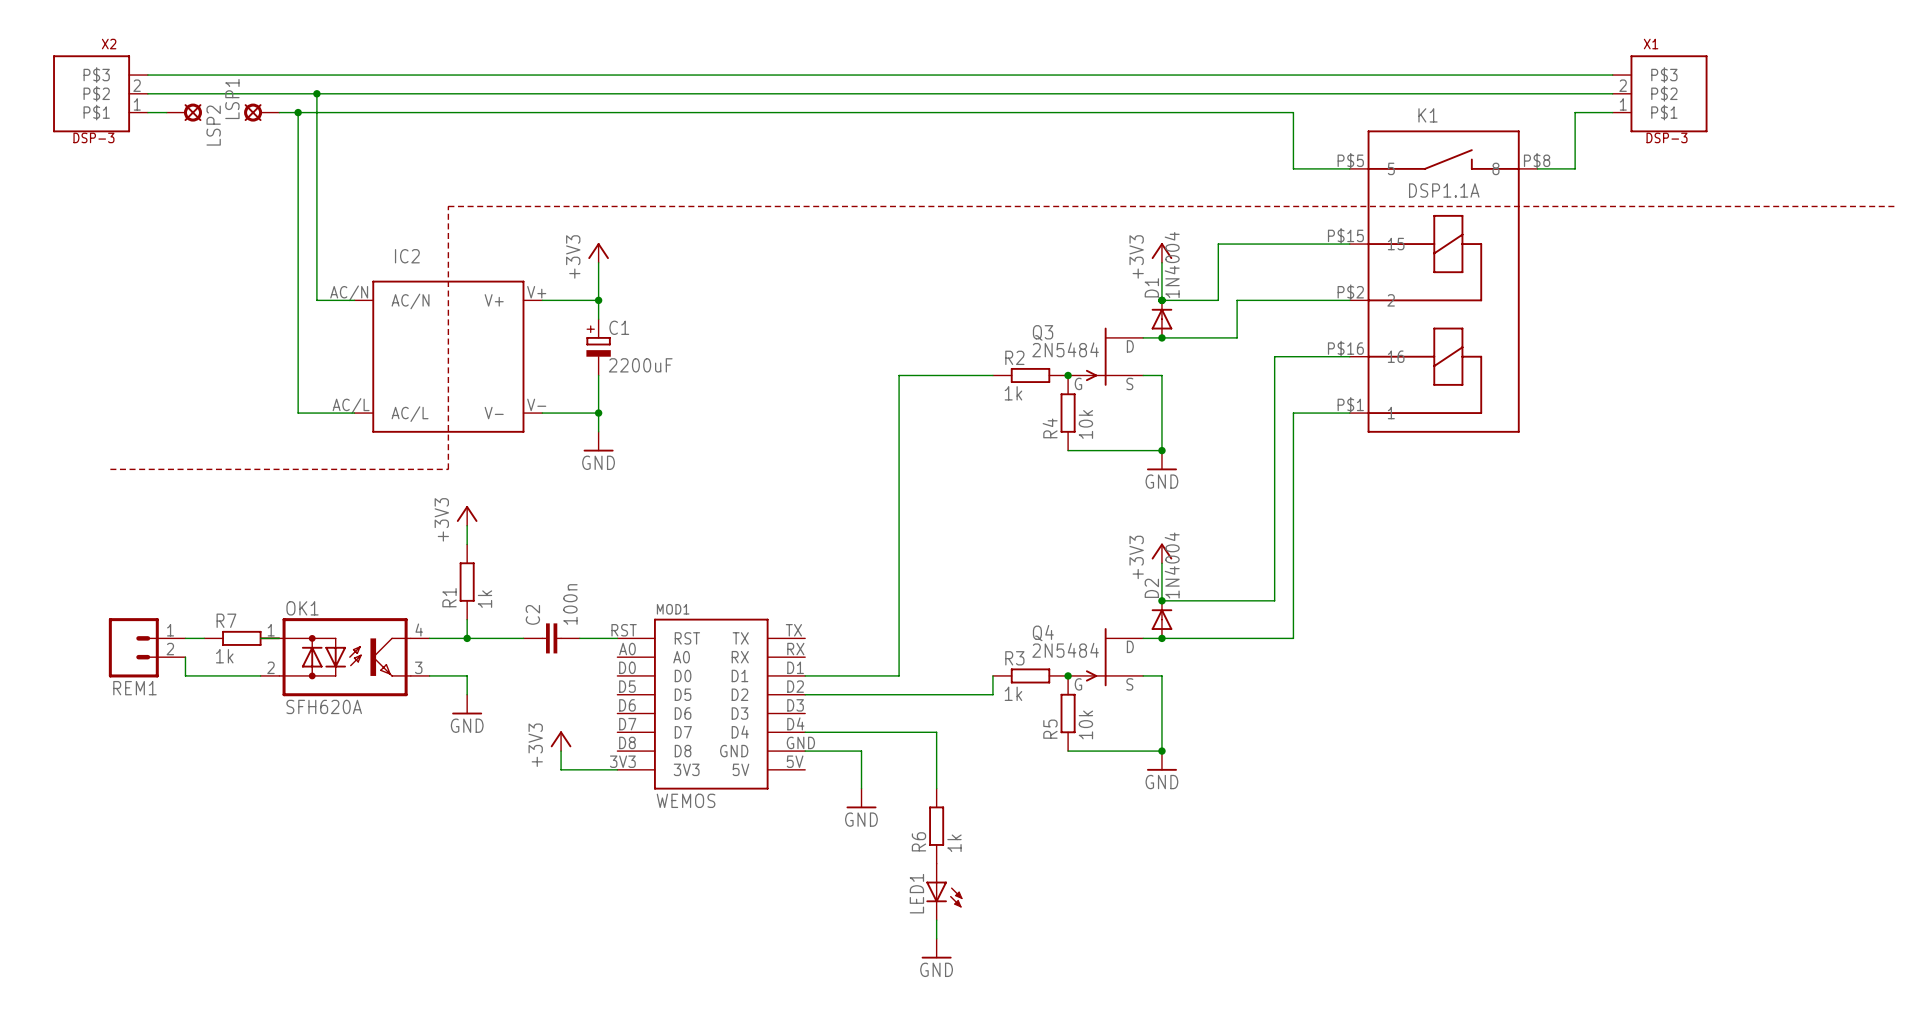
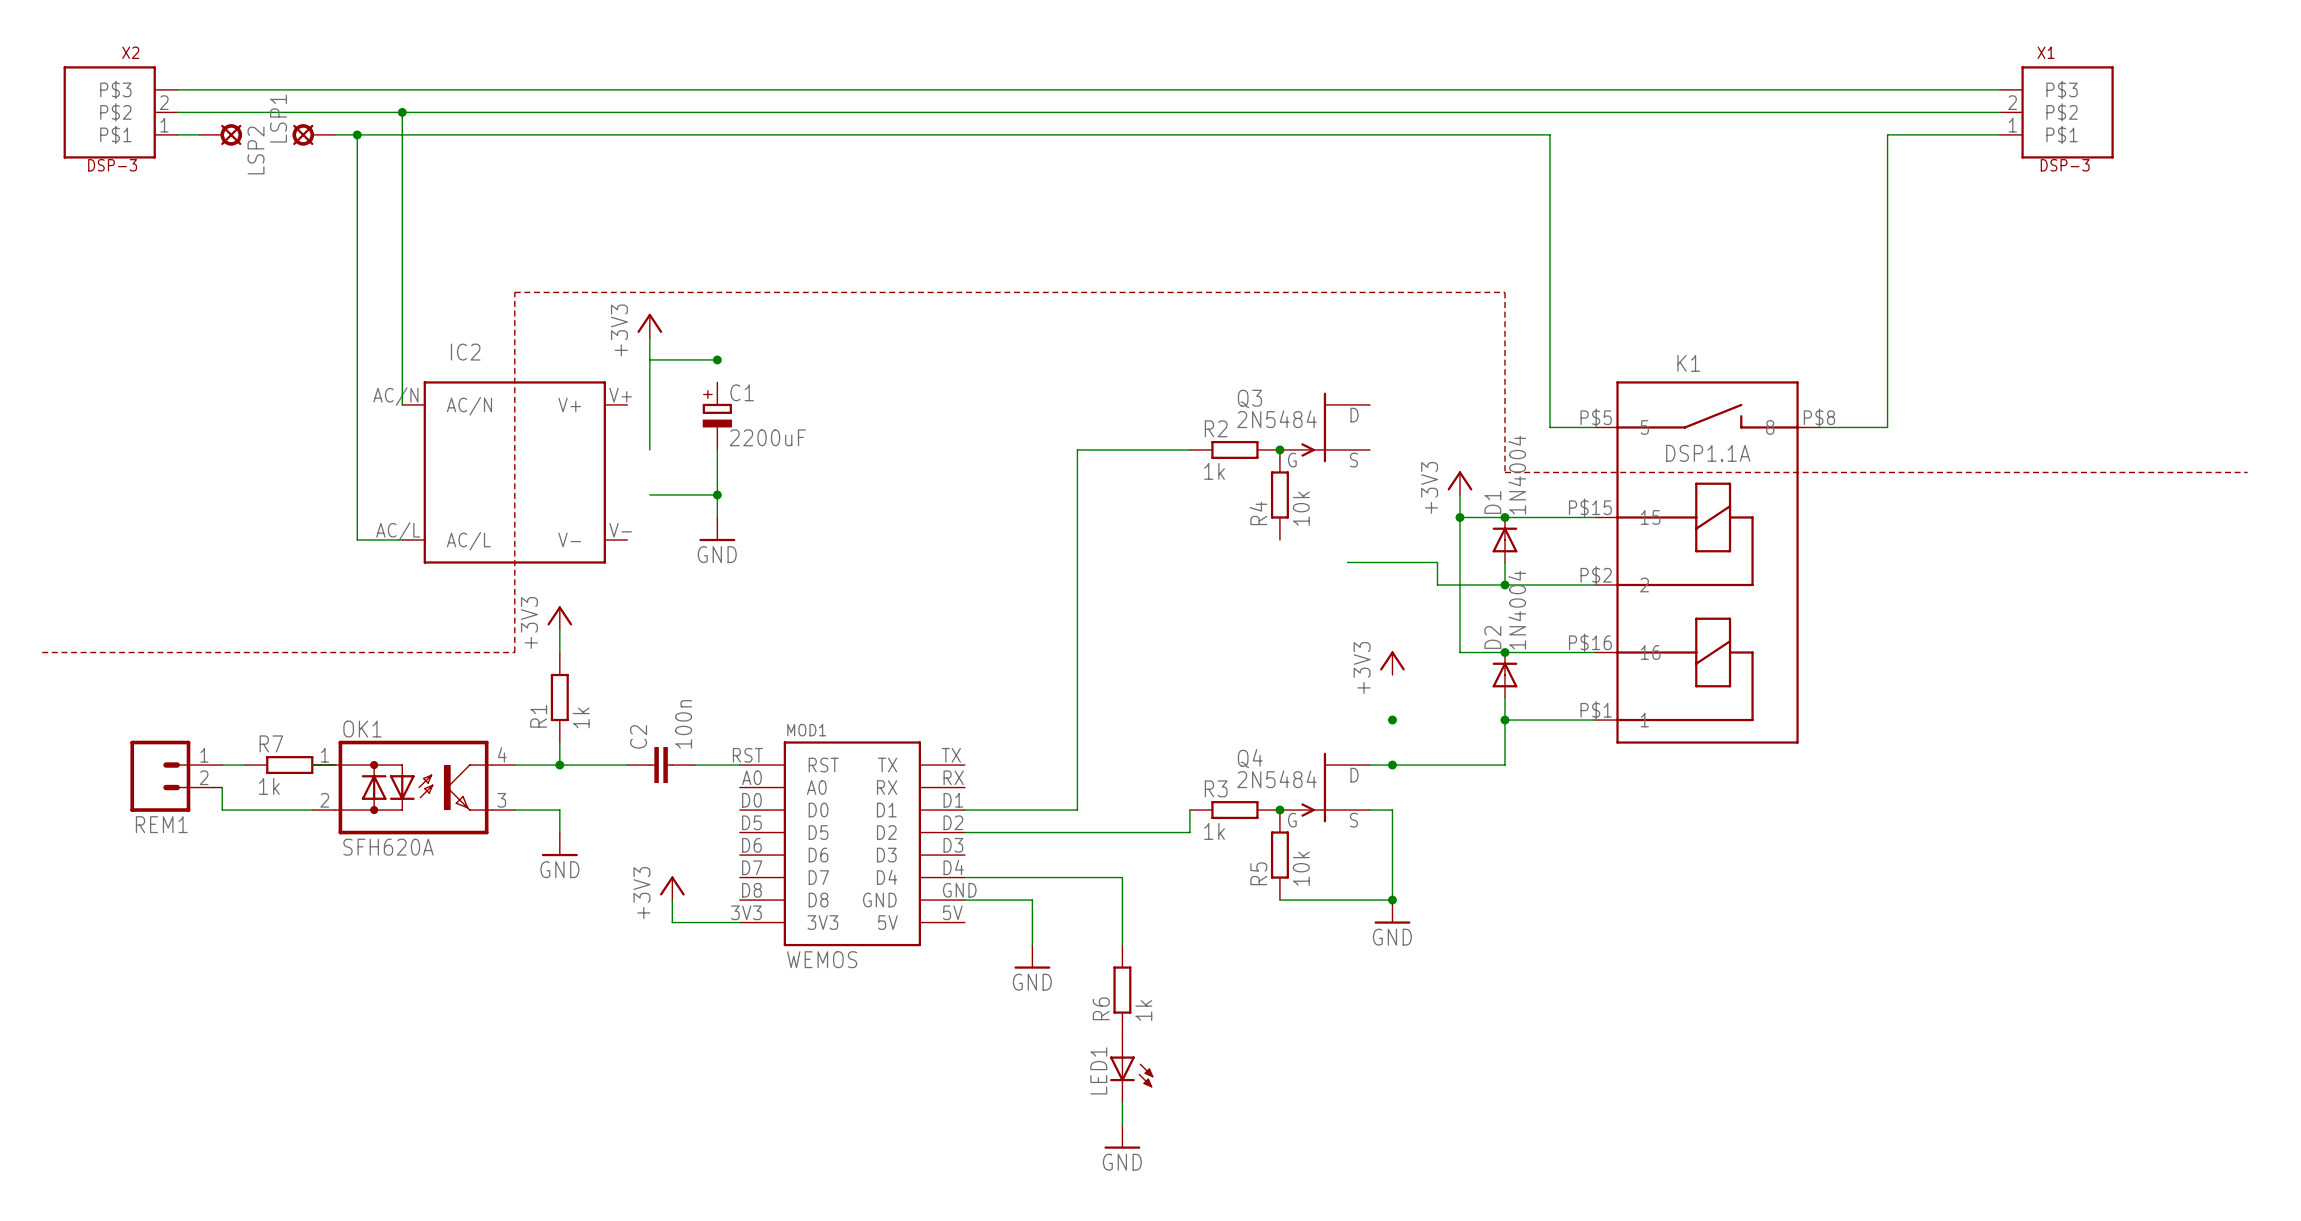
wire: none -> (1932, 89) (2000, 89)
wire: (316, 93) (316, 300) (354, 300) -> none
junction position: (316, 93) -> (402, 112)
wire: none -> (402, 112) (402, 404)
wire: none -> (1932, 112) (2000, 112)
X1 position: (1660, 93) -> (2056, 112)
wire: none -> (1932, 134) (2000, 134)
wire: (1293, 168) (1349, 168) -> (1550, 202) (1550, 427)
wire: (1537, 168) (1575, 168) -> (1820, 427) (1887, 427) (1887, 202)
line: (1894, 206) (448, 206) (448, 469) (110, 469) -> none
wire: (1349, 244) (1218, 244) (1218, 300) (1161, 300) (1161, 262) -> none
power symbol position: +3V3 (598, 252) -> +3V3 (649, 325)
power symbol position: +3V3 (1161, 252) -> +3V3 (1459, 483)
wire: (598, 262) (598, 319) -> none
wire: none -> (649, 337) (649, 449)
K1 position: (1443, 281) -> (1707, 562)
junction: (1161, 300) -> none
wire: (1349, 300) (1237, 300) (1237, 337) (1143, 337) -> none
D1 position: (1161, 319) -> (1504, 539)
junction: (1161, 337) -> none
IC2 position: (448, 356) -> (514, 472)
wire: (1293, 356) (1274, 356) (1274, 600) -> (1595, 720) (1527, 720)
wire: (1143, 375) (1161, 375) (1161, 450) (1068, 450) -> none
line: none -> (2247, 472) (1504, 472) (1504, 292) (514, 292) (514, 652) (42, 652)
wire: (298, 413) (354, 413) -> (357, 494) (357, 539) (402, 539)
wire: none -> (1459, 494) (1459, 652) (1595, 652)
wire: (1349, 413) (1293, 413) (1293, 638) (1255, 638) -> (1504, 697) (1504, 765)
wire: none -> (1459, 517) (1595, 517)
junction: none -> (1459, 517)
junction: none -> (1504, 517)
junction: (1161, 450) -> none
power symbol: GND (1161, 460) -> none
wire: none -> (1347, 562) (1437, 562) (1437, 584) (1595, 584)
wire: none -> (1504, 562) (1504, 584)
junction: none -> (1504, 584)
junction: none -> (1504, 652)
wire: (1161, 563) (1161, 600) (1255, 600) -> none
junction: none -> (1504, 720)
D2 position: (1161, 619) -> (1504, 675)

